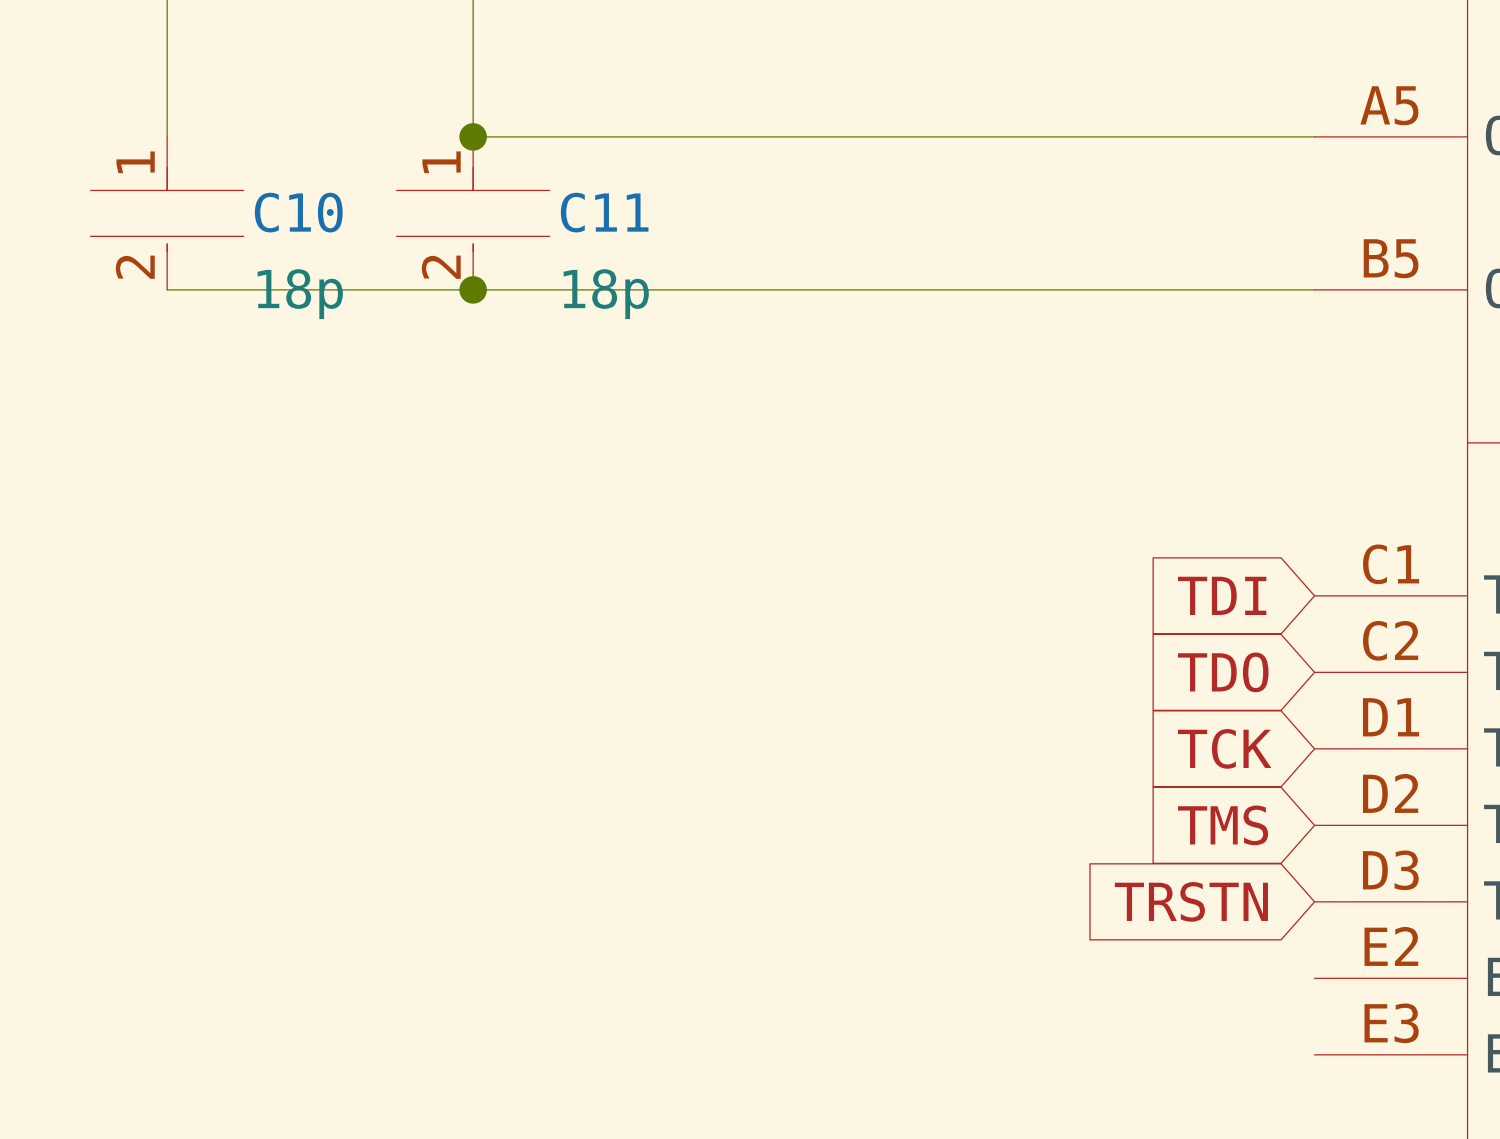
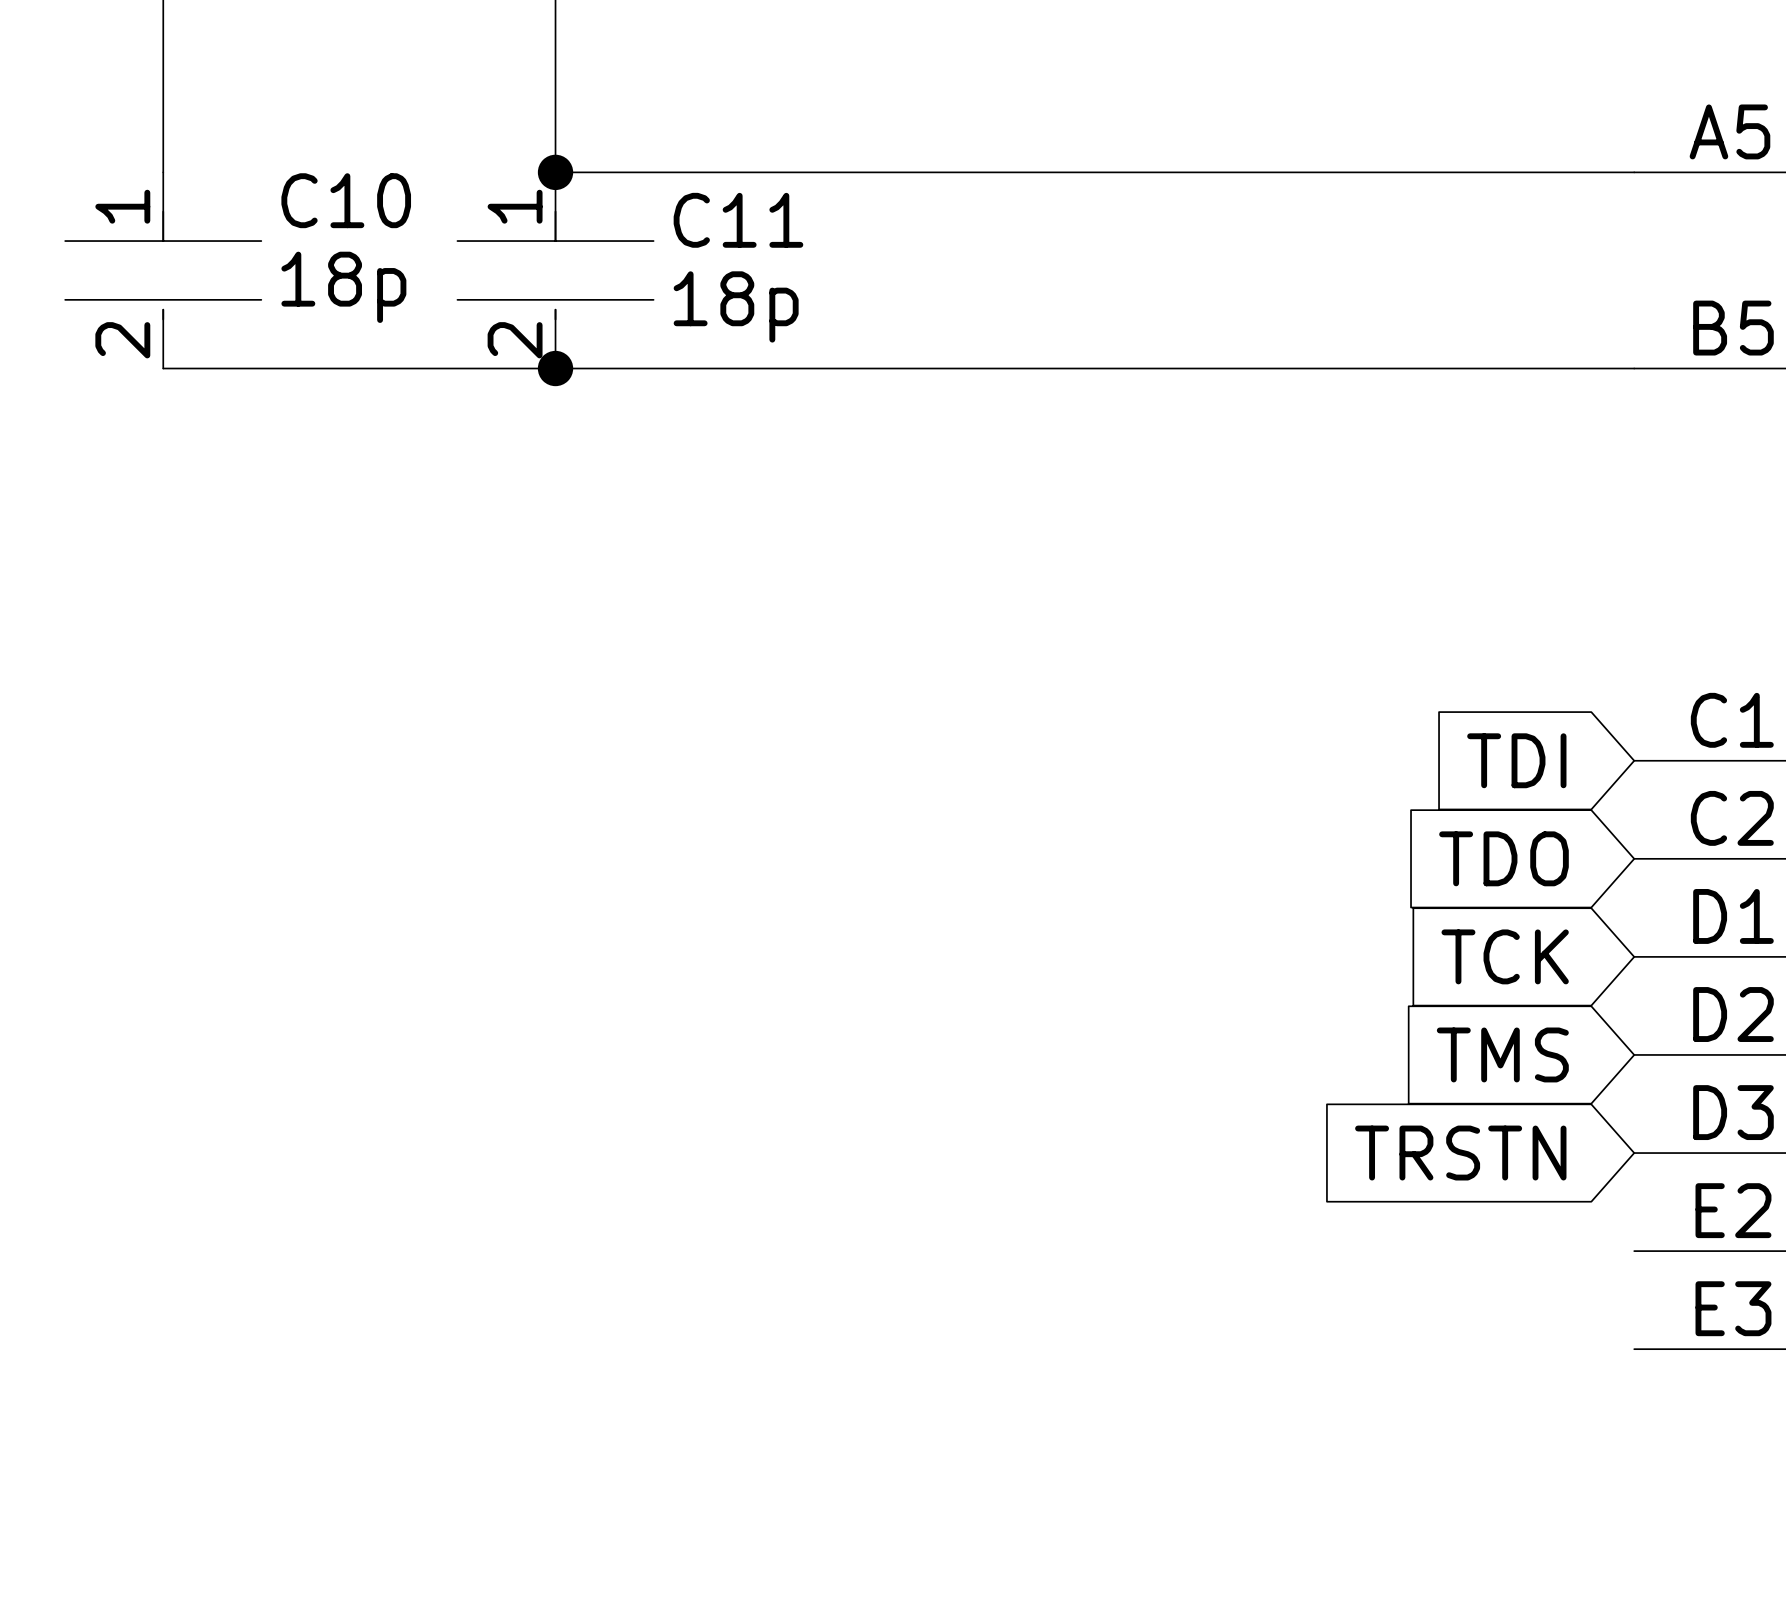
C10 name position: C10 (298, 212) -> C10 (346, 200)
C11 name position: C11 (604, 212) -> C11 (738, 220)
C10 value position: 18p (300, 294) -> 18p (343, 287)
C11 value position: 18p (606, 294) -> 18p (736, 306)

